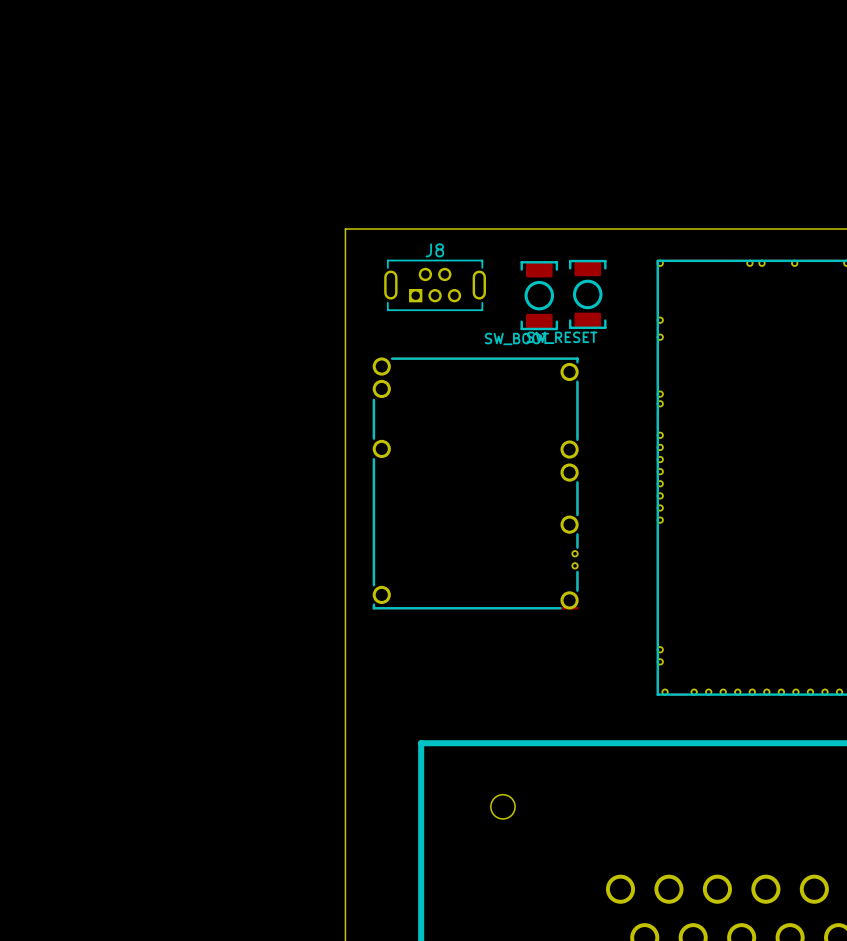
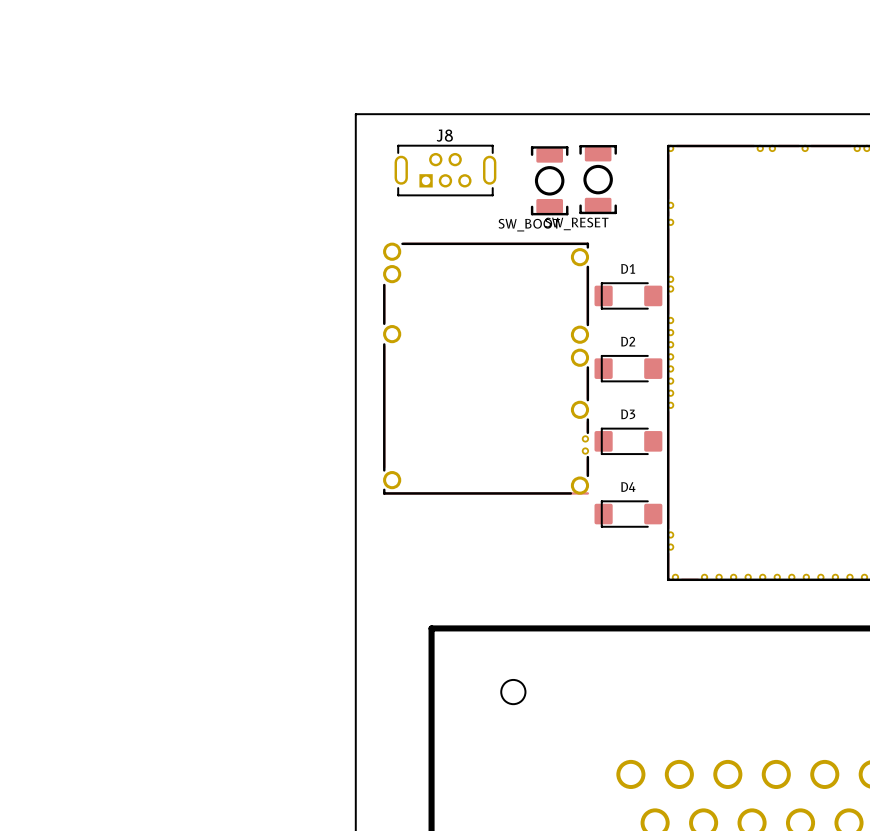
D1: none -> (628, 295)
D2: none -> (628, 368)
D3: none -> (628, 441)
D4: none -> (628, 514)

